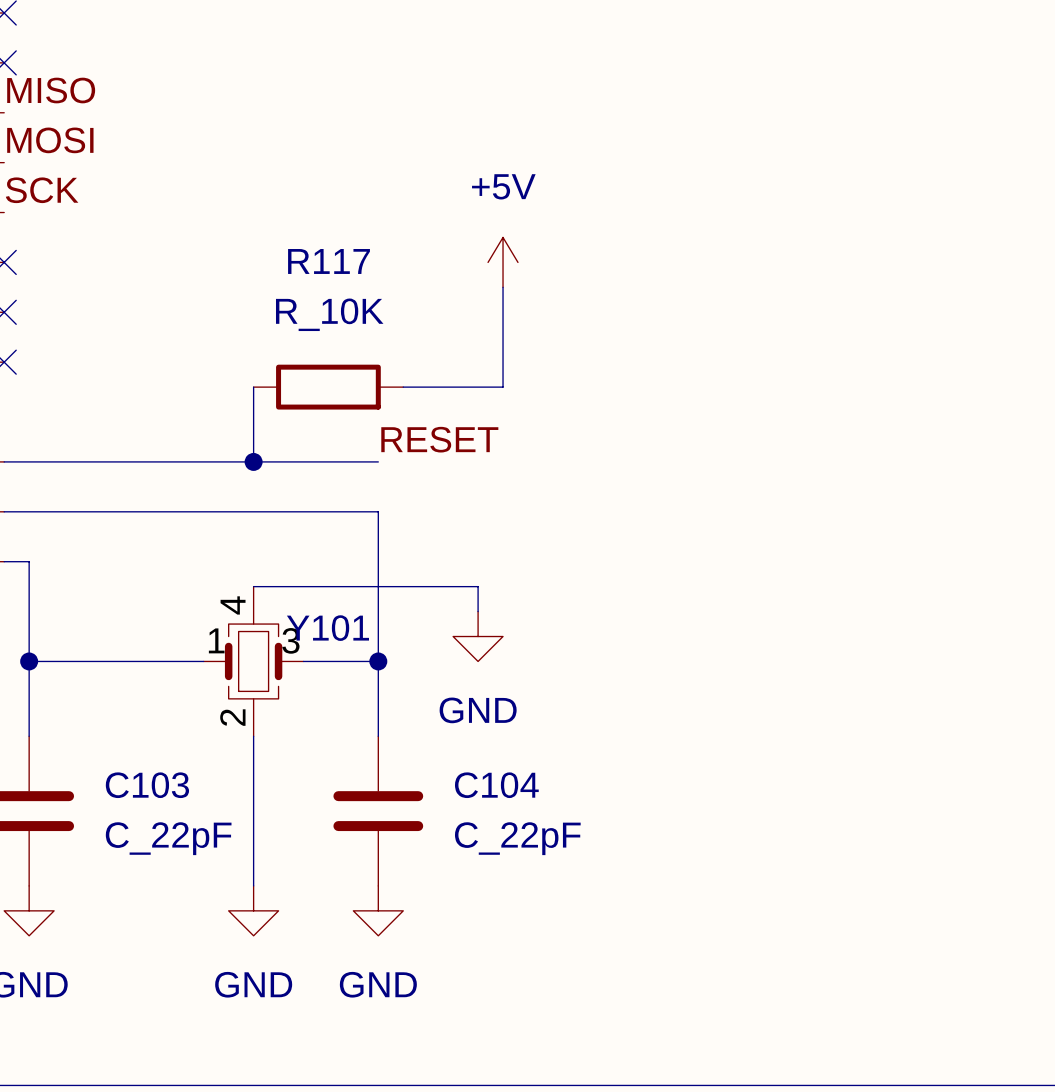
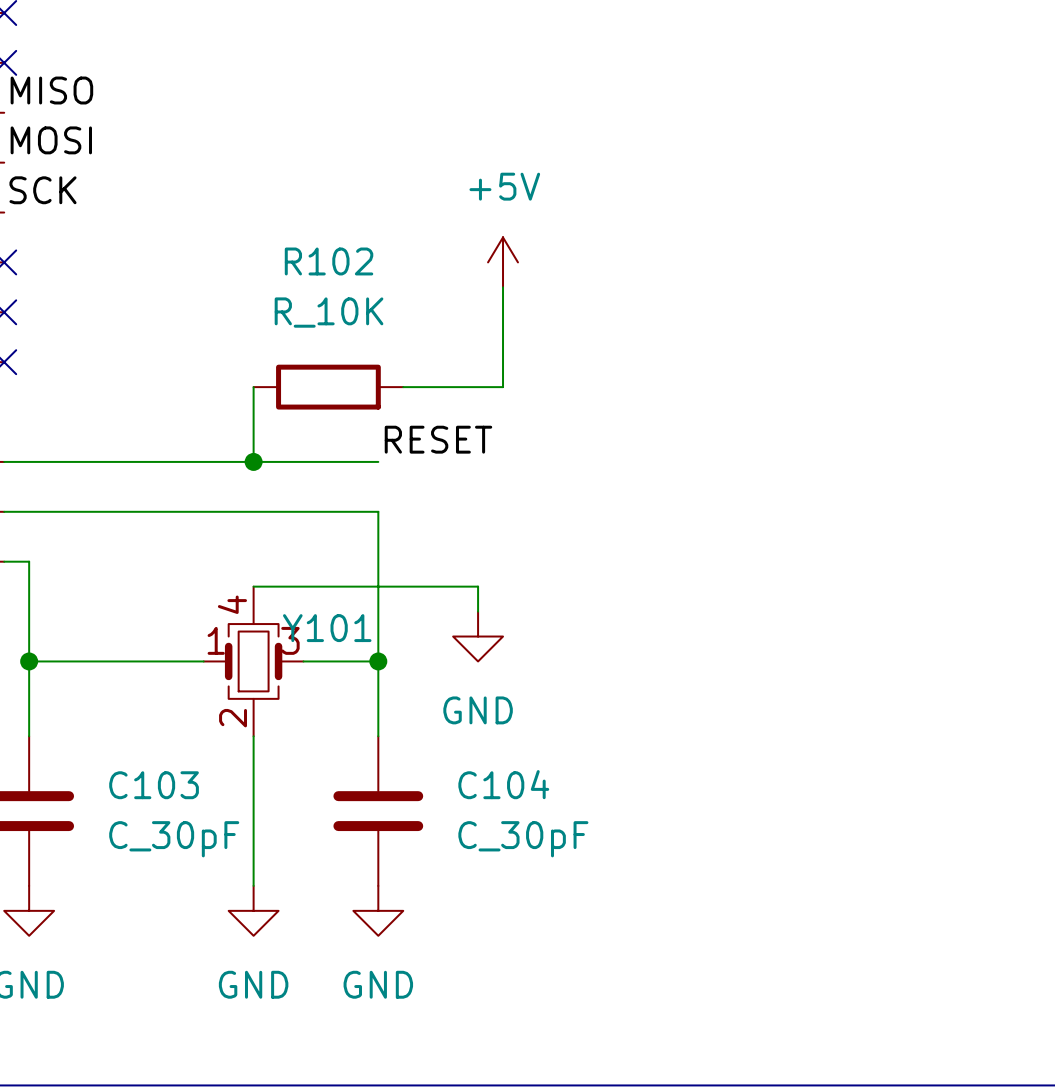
R117 name: R117 (329, 261) -> R102 (329, 261)
C103 value: C_22pF (168, 838) -> C_30pF (174, 839)
C104 value: C_22pF (517, 838) -> C_30pF (523, 839)

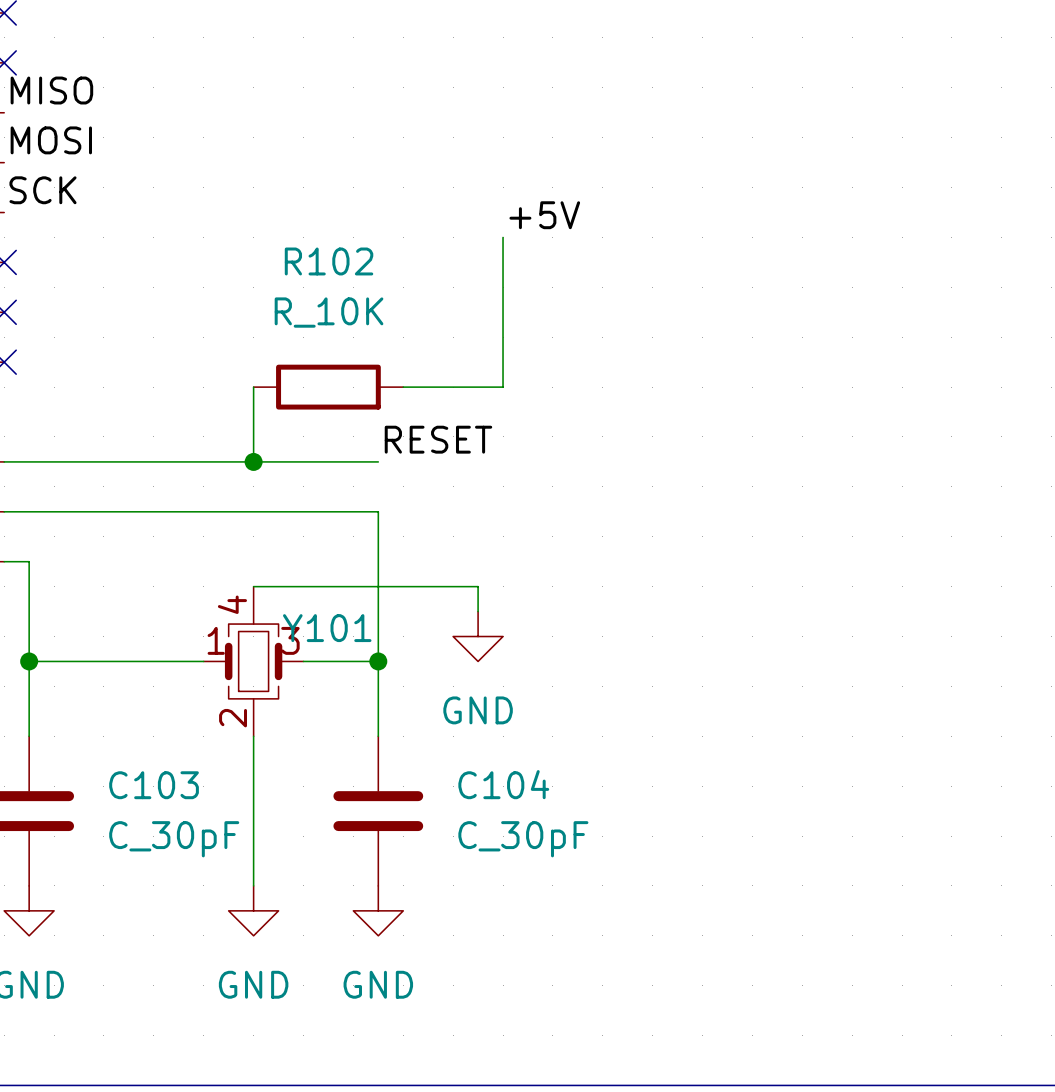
label: none -> +5V (544, 215)
power symbol: +5V (503, 262) -> none

